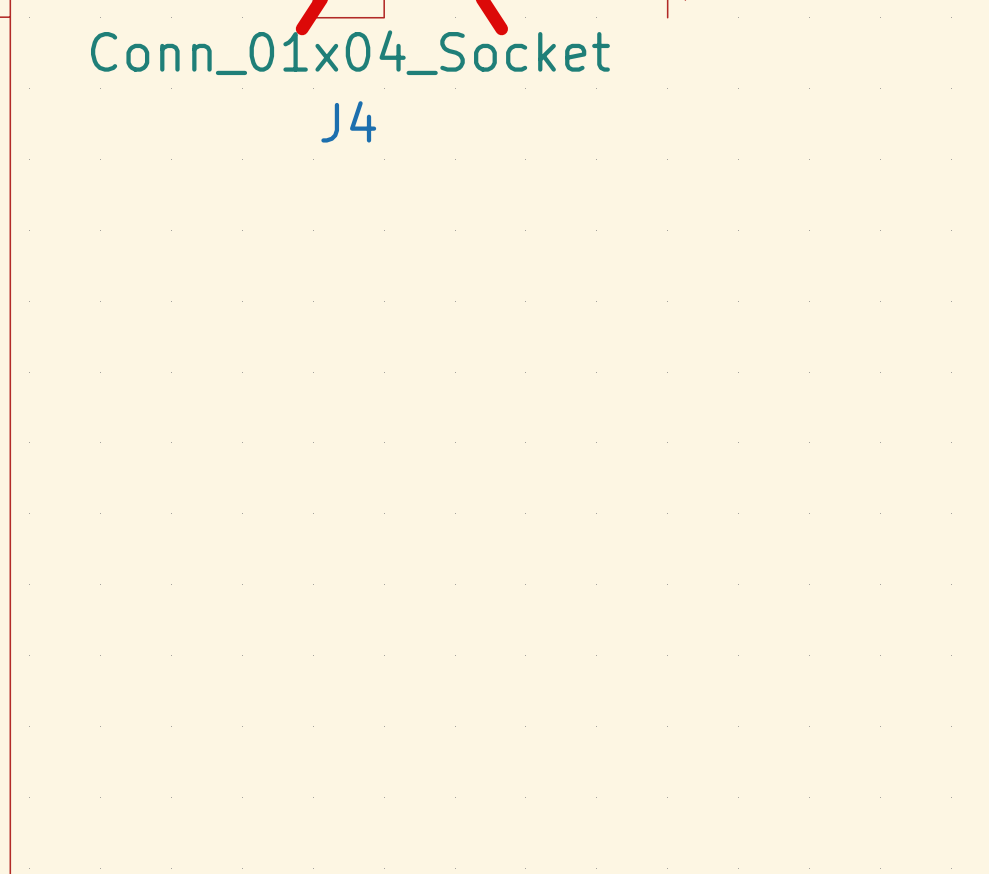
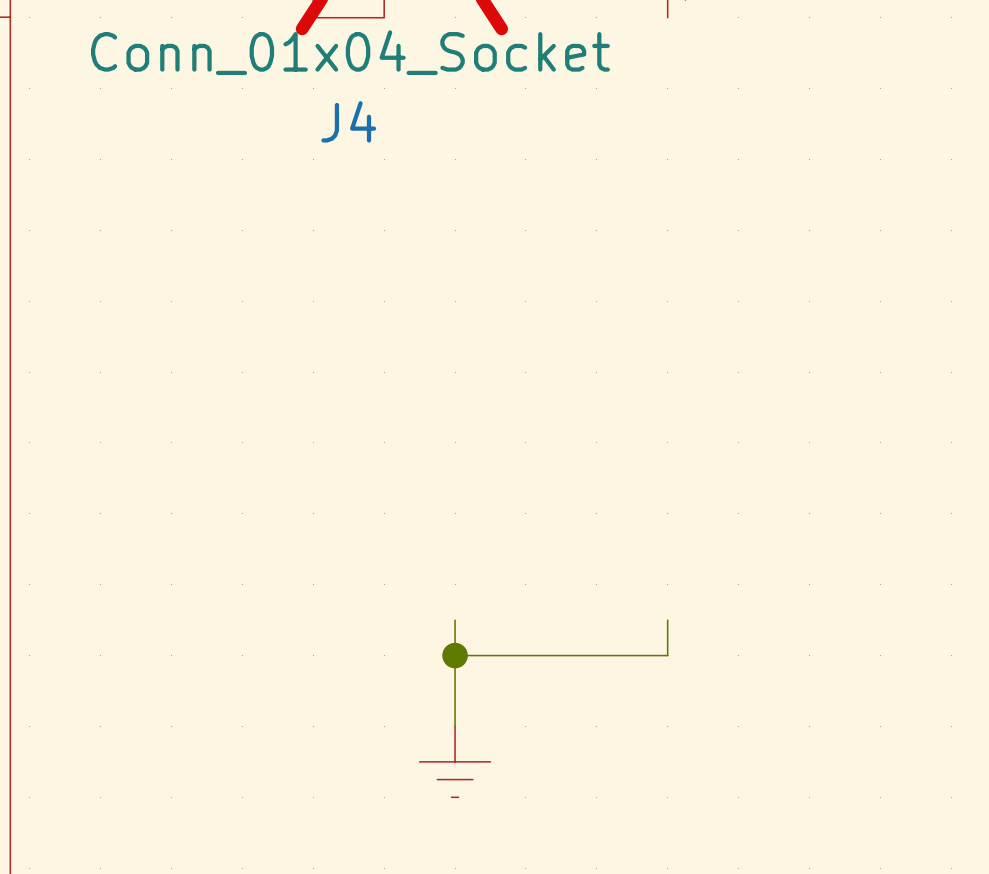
wire: none -> (455, 620) (455, 726)
wire: none -> (667, 620) (667, 655) (455, 655)
junction: none -> (455, 655)
power symbol: none -> (455, 761)

